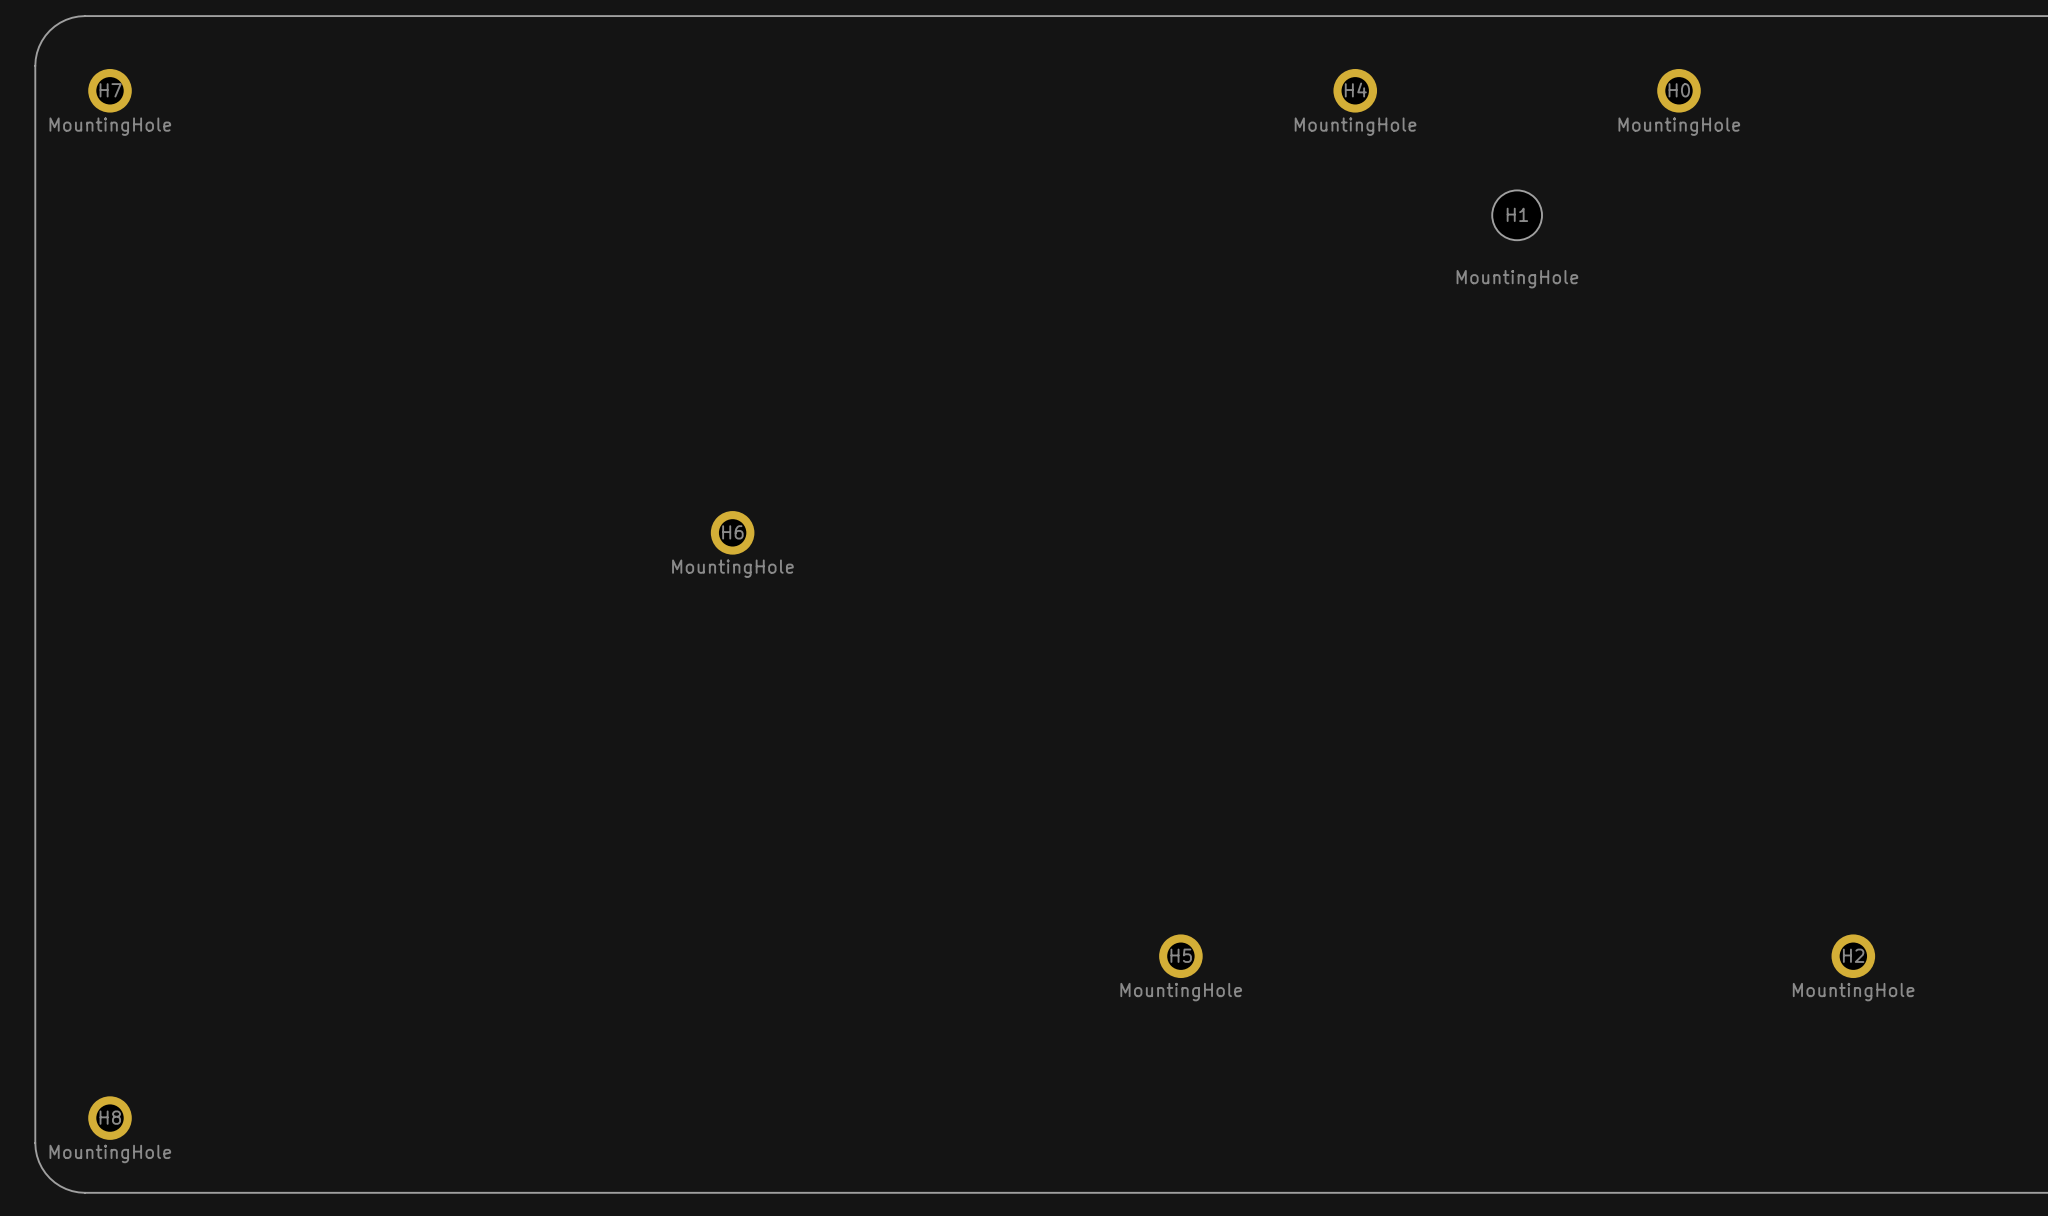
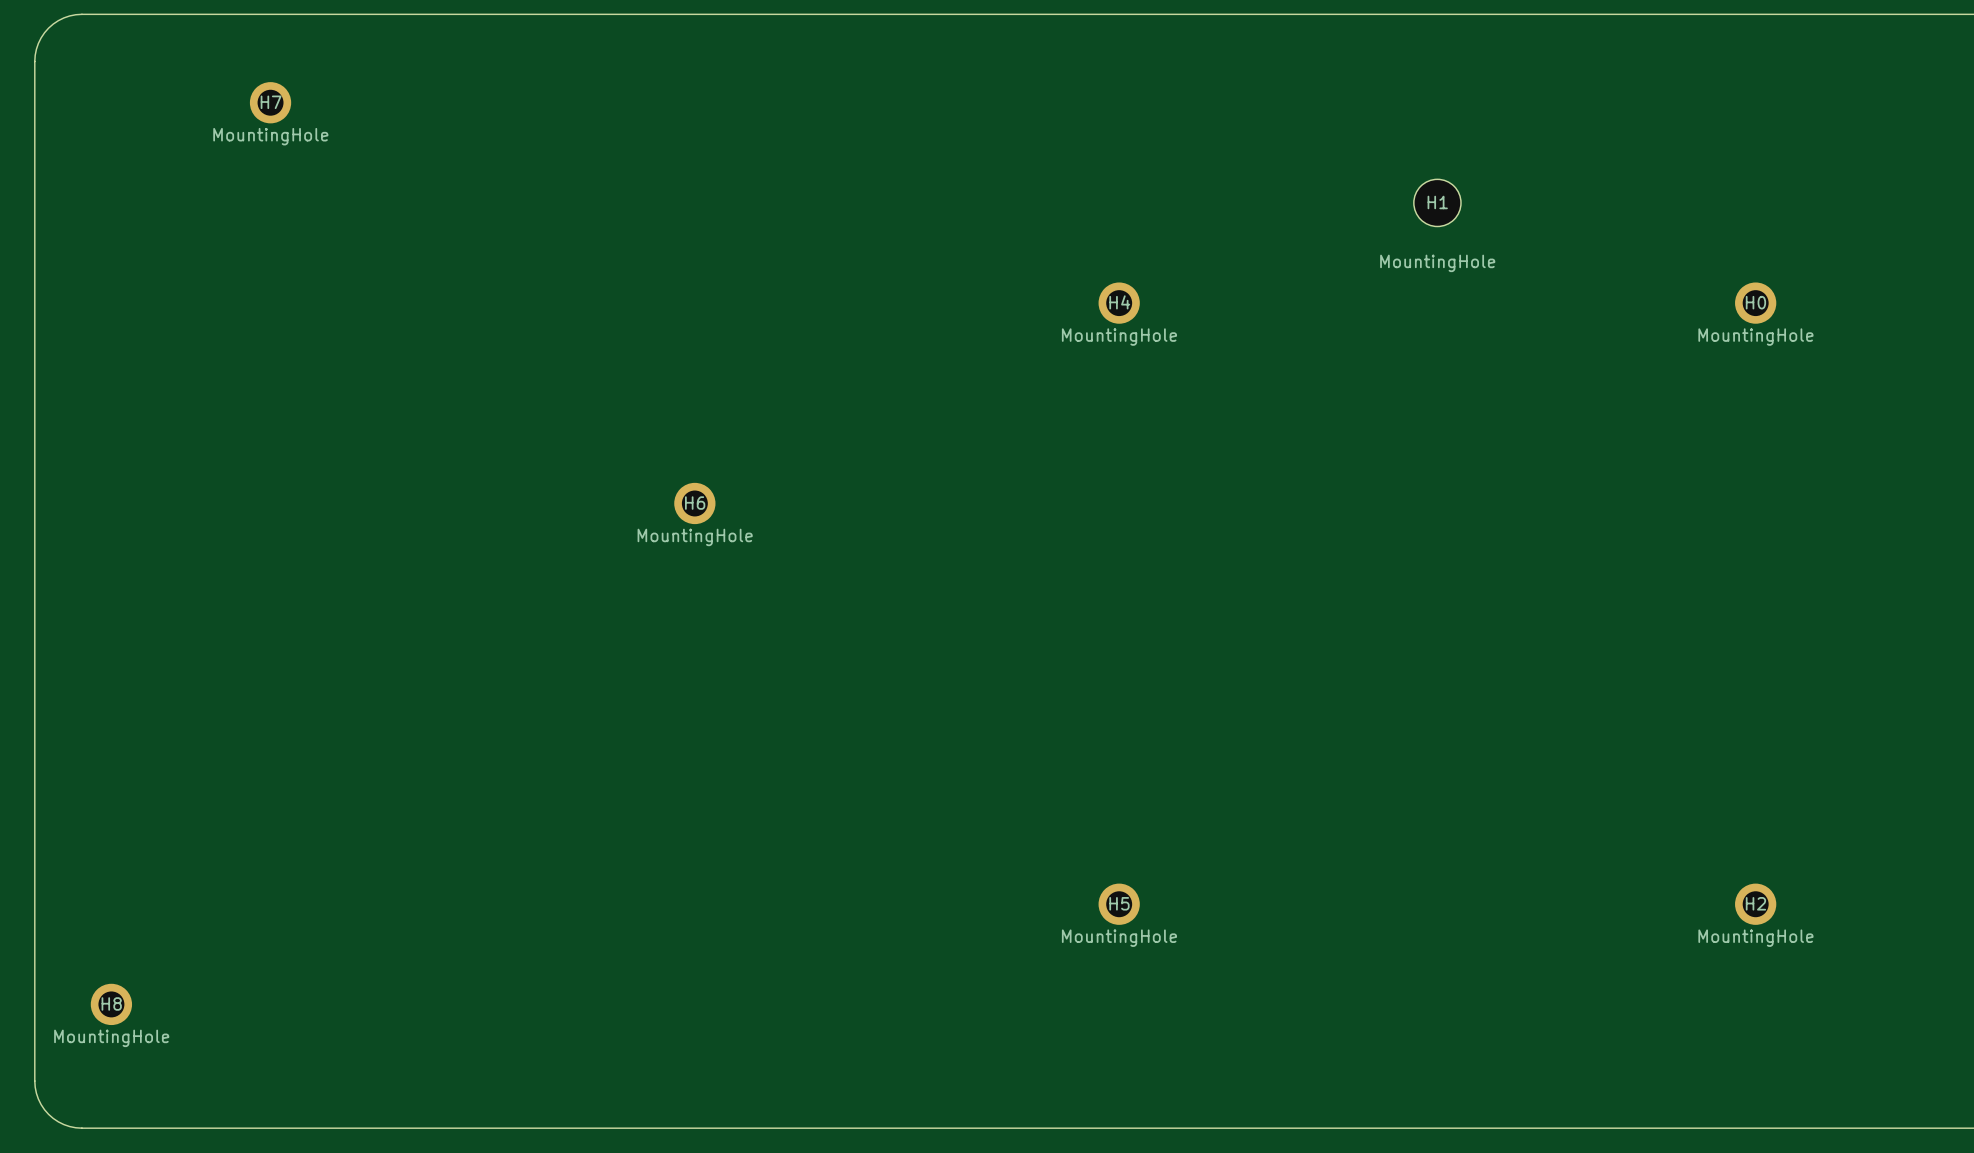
H7 position: (110, 90) -> (270, 102)
H4 position: (1355, 90) -> (1119, 303)
H0 position: (1679, 90) -> (1755, 303)
H8 position: (110, 1118) -> (111, 1004)

